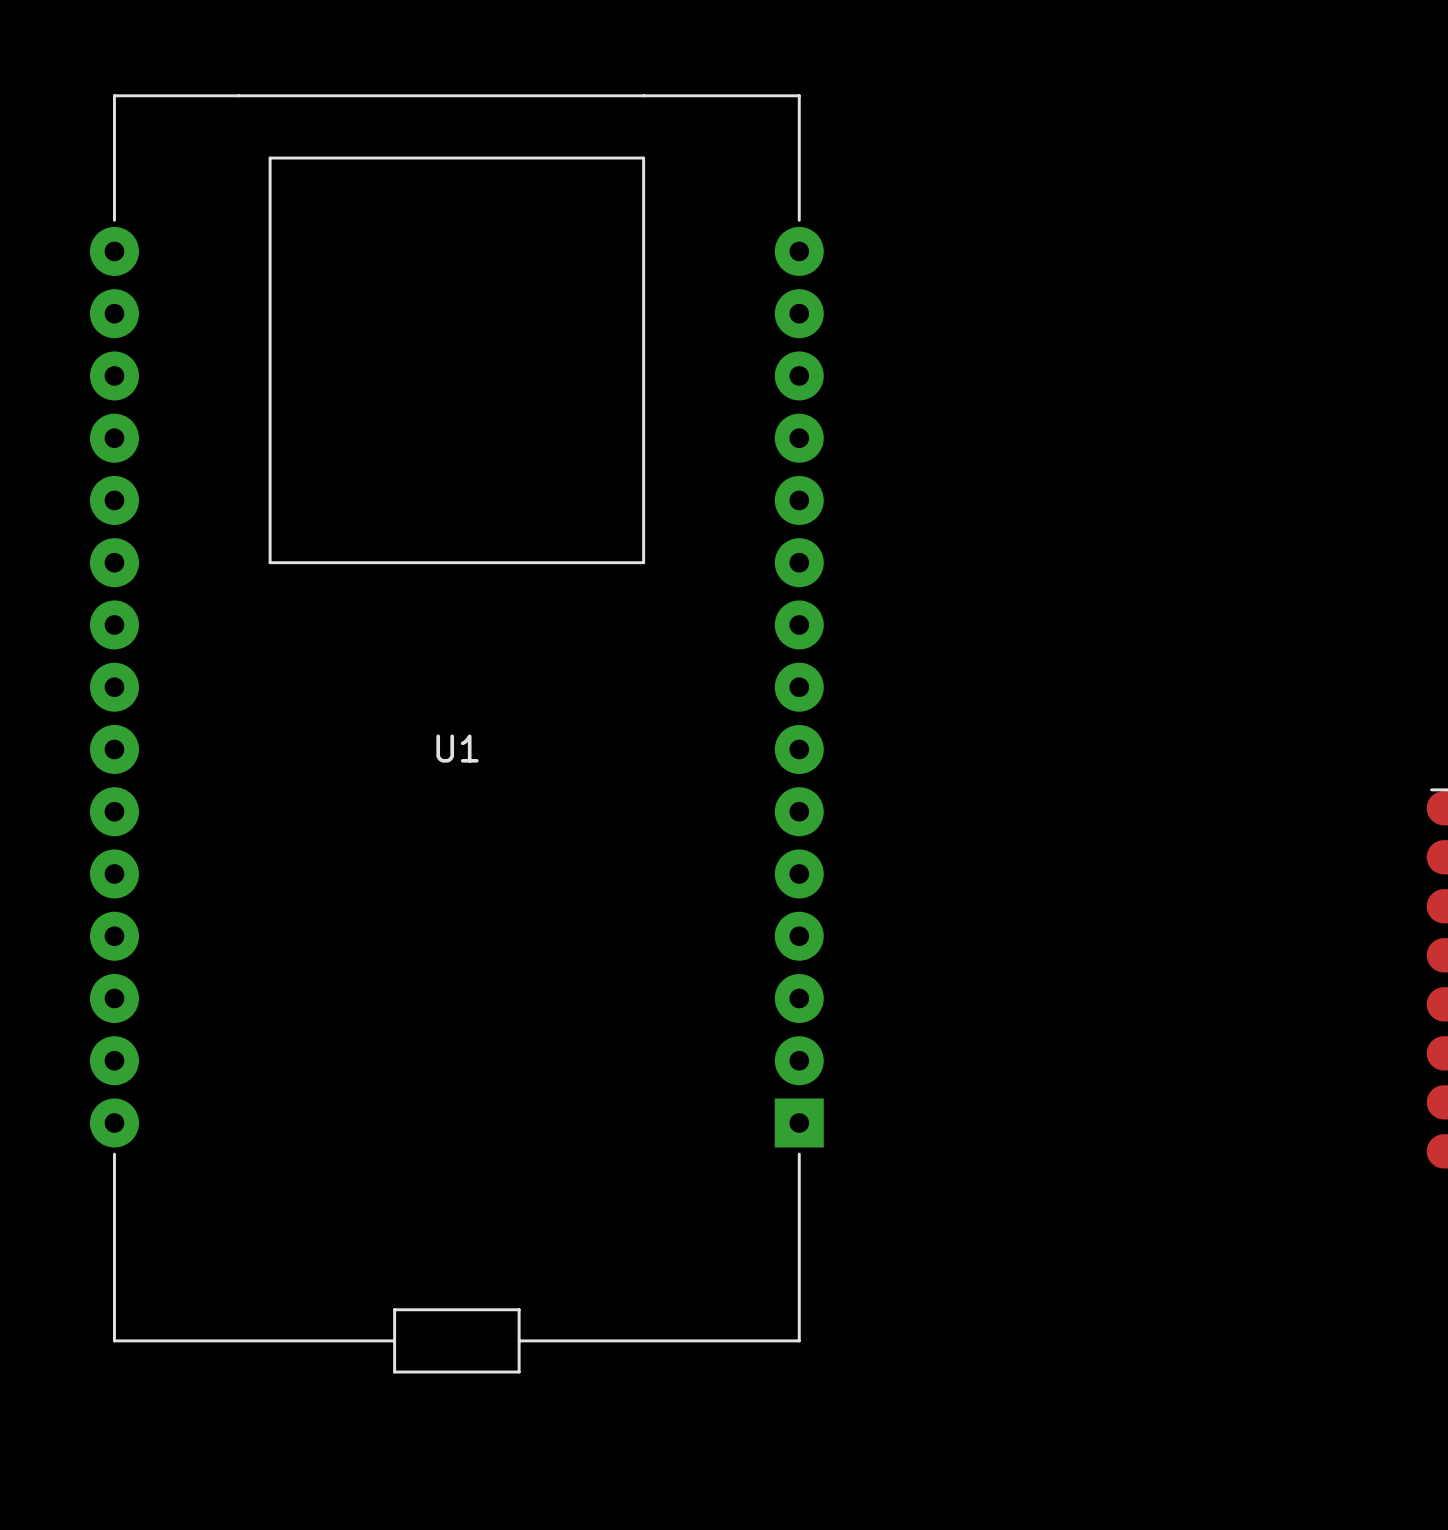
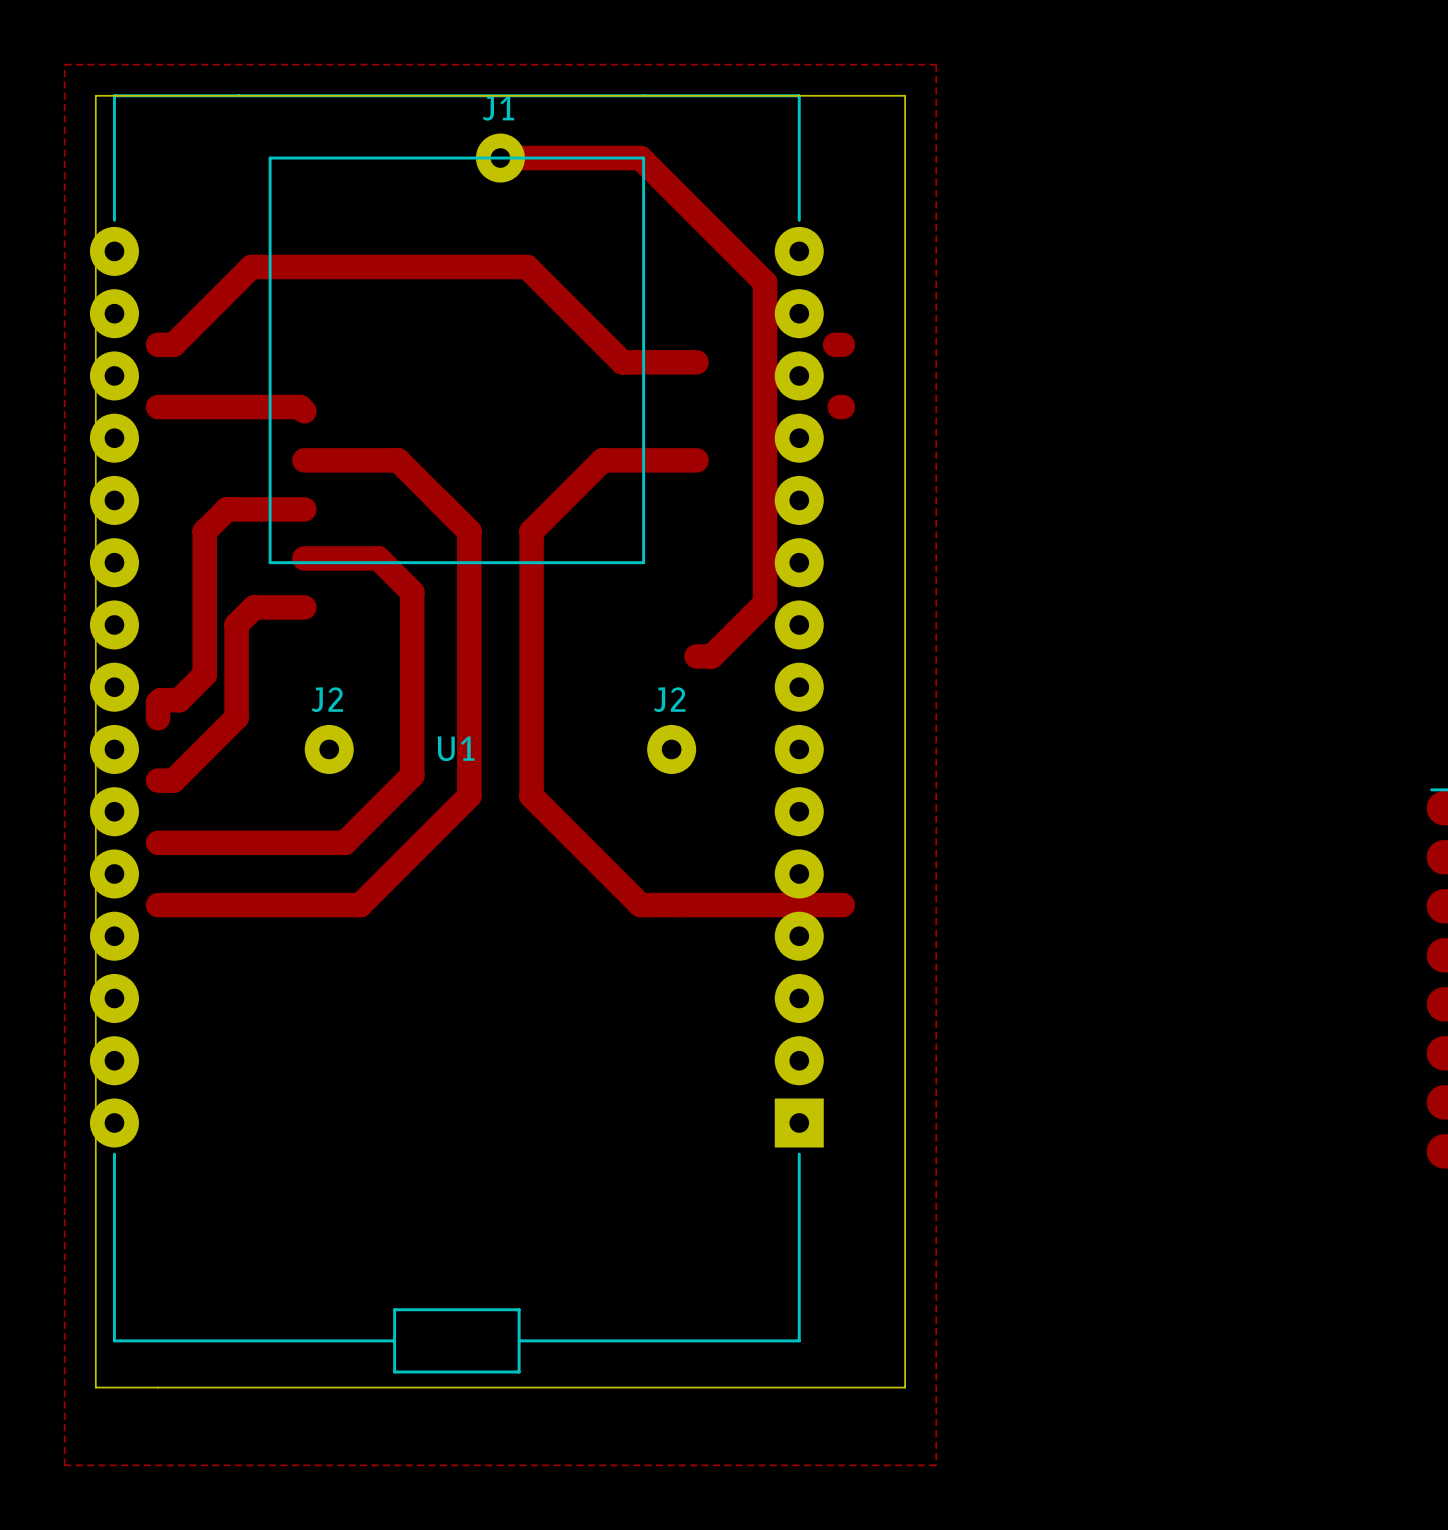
zone outline: none -> (64, 64) (64, 1465) (936, 1465) (936, 64) (64, 64)
board edge: none -> (95, 95) (95, 1387) (905, 1387) (905, 95) (95, 95)
track: none -> (500, 158) (640, 158) (765, 282) (765, 603) (711, 656) (696, 656)
J1: none -> (500, 158)
track: none -> (158, 344) (173, 344) (251, 266) (527, 266) (622, 362) (696, 362)
track: none -> (835, 344) (842, 344)
track: none -> (158, 407) (300, 407) (304, 411)
track: none -> (839, 407) (842, 407)
track: none -> (304, 460) (398, 460) (469, 531) (469, 796) (360, 905) (158, 905)
track: none -> (696, 460) (602, 460) (531, 531) (531, 796) (640, 905) (842, 905)
track: none -> (304, 509) (226, 509) (204, 531) (204, 674) (179, 700) (160, 700) (158, 702) (158, 718)
track: none -> (304, 558) (378, 558) (412, 592) (412, 775) (344, 842) (158, 842)
track: none -> (304, 607) (254, 607) (236, 624) (236, 717) (173, 780) (158, 780)
J2: none -> (329, 749)
J2: none -> (671, 749)

